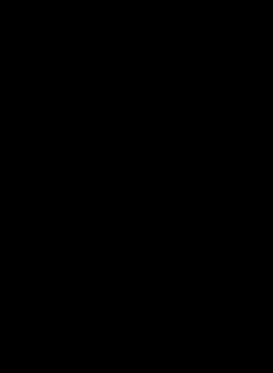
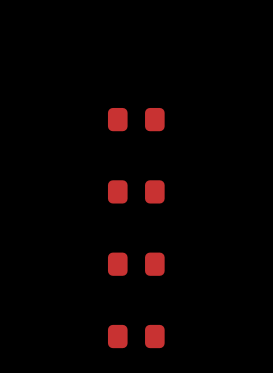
part: none -> (136, 119)
part: none -> (136, 191)
part: none -> (136, 264)
part: none -> (136, 336)

